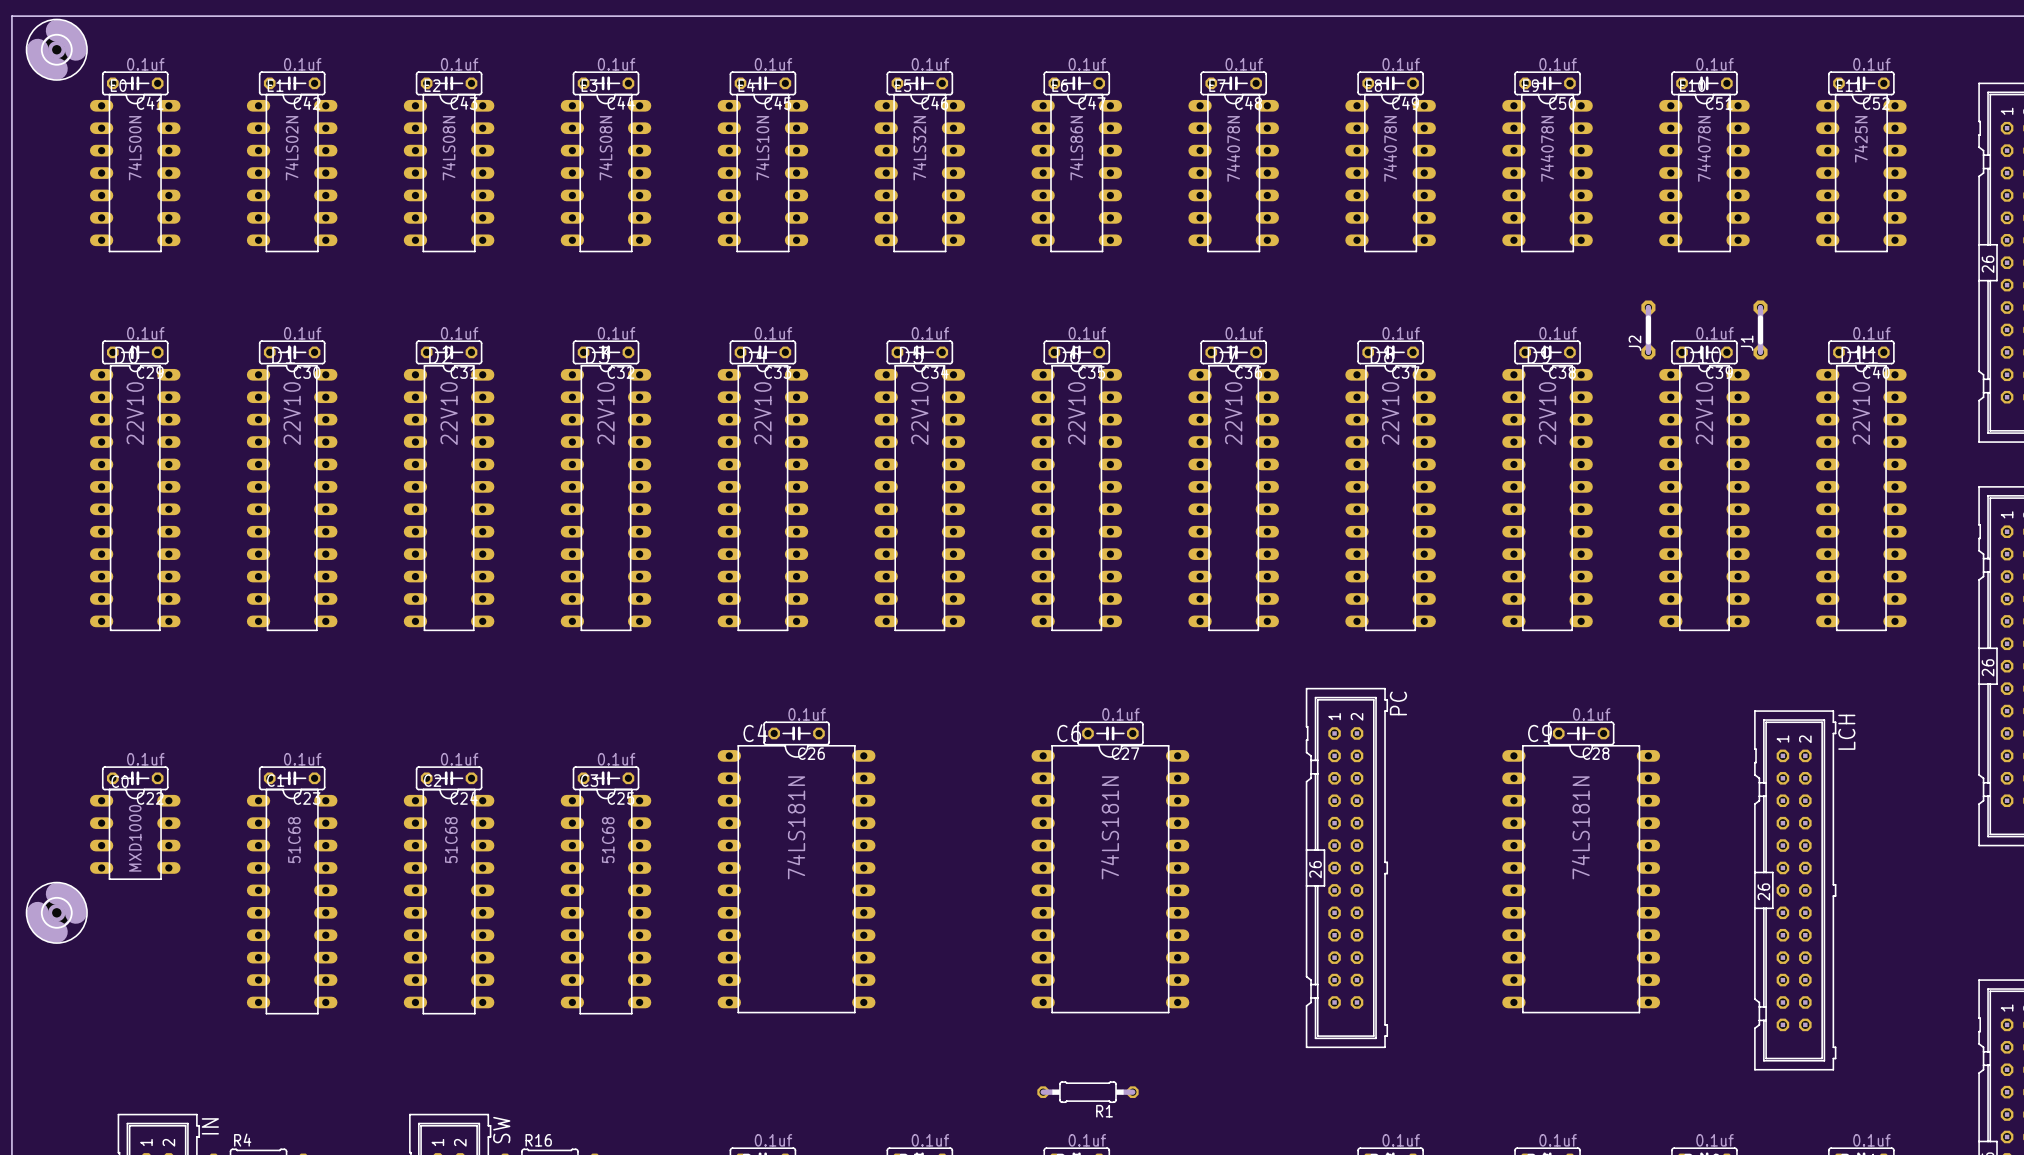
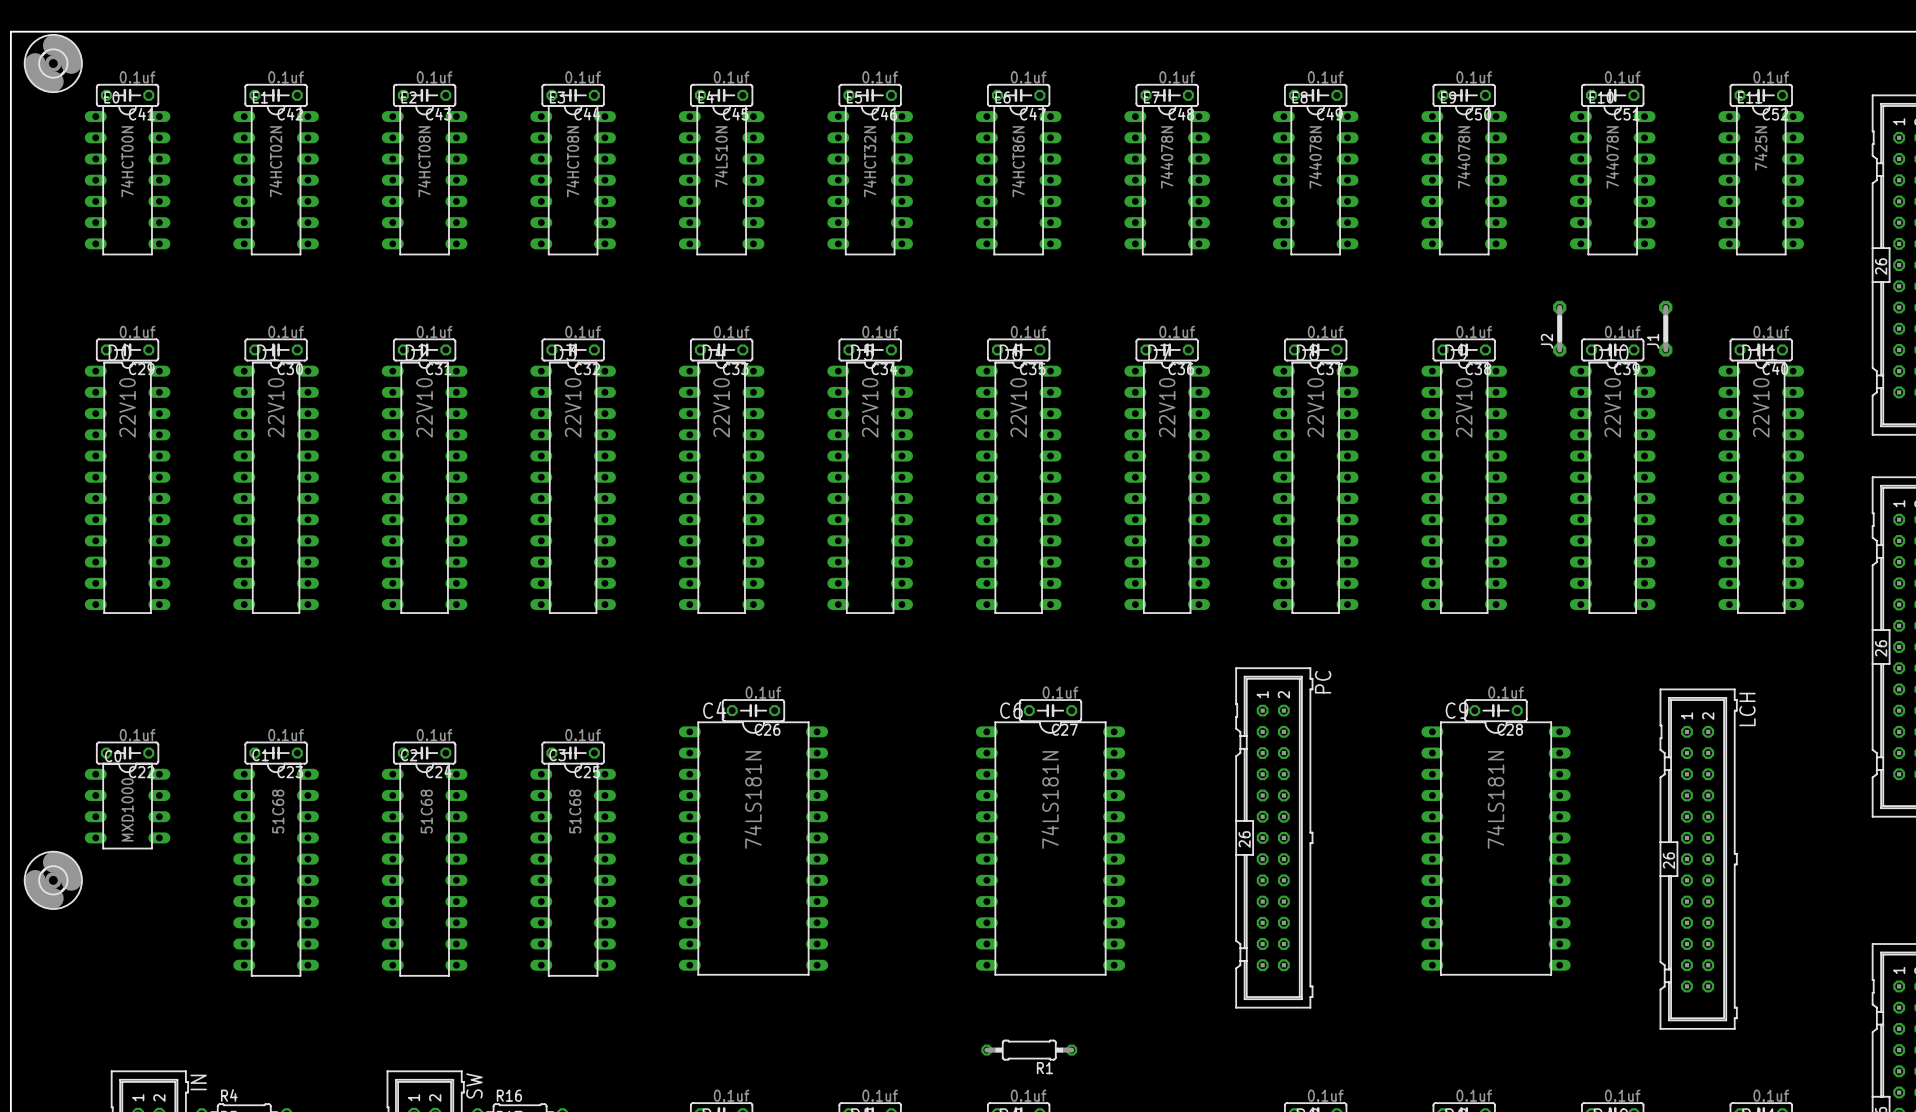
E0 value: 74LS00N (134, 148) -> 74HCT00N (127, 161)
E1 value: 74LS02N (291, 148) -> 74HCT02N (275, 161)
E2 value: 74LS08N (448, 148) -> 74HCT08N (424, 161)
E3 value: 74LS08N (605, 148) -> 74HCT08N (572, 161)
E5 value: 74LS32N (919, 148) -> 74HCT32N (869, 161)
E6 value: 74LS86N (1076, 148) -> 74HCT86N (1018, 161)

